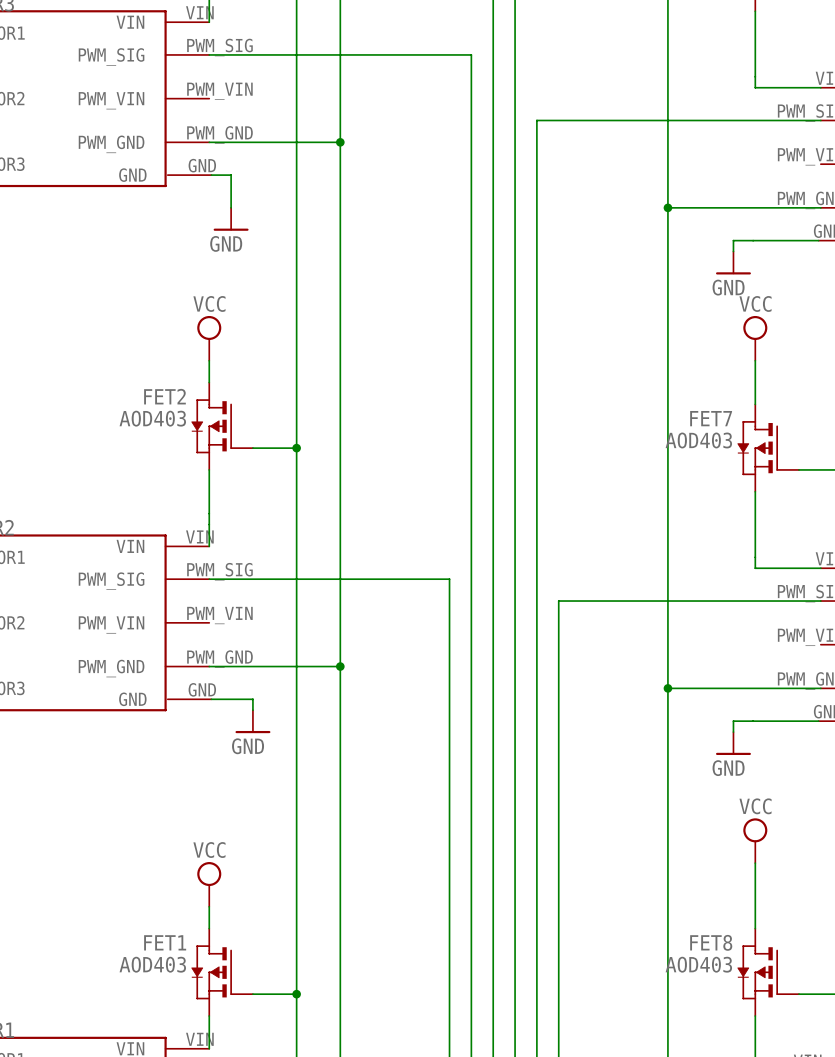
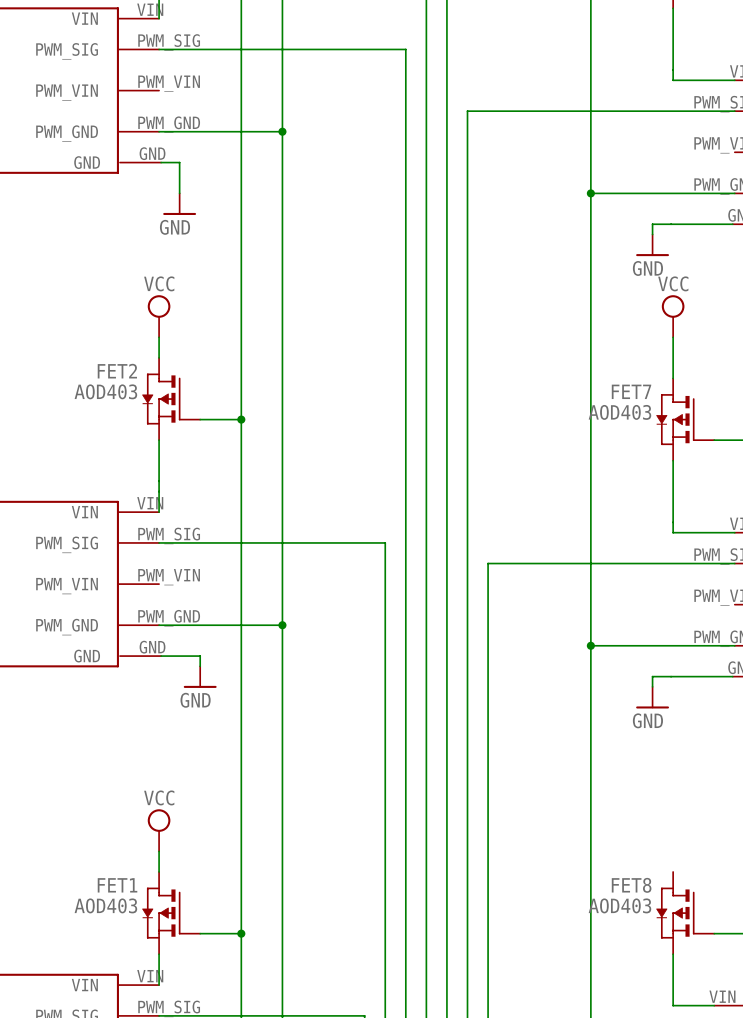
power symbol: VCC (755, 840) -> none
wire: (755, 863) (755, 928) -> none

